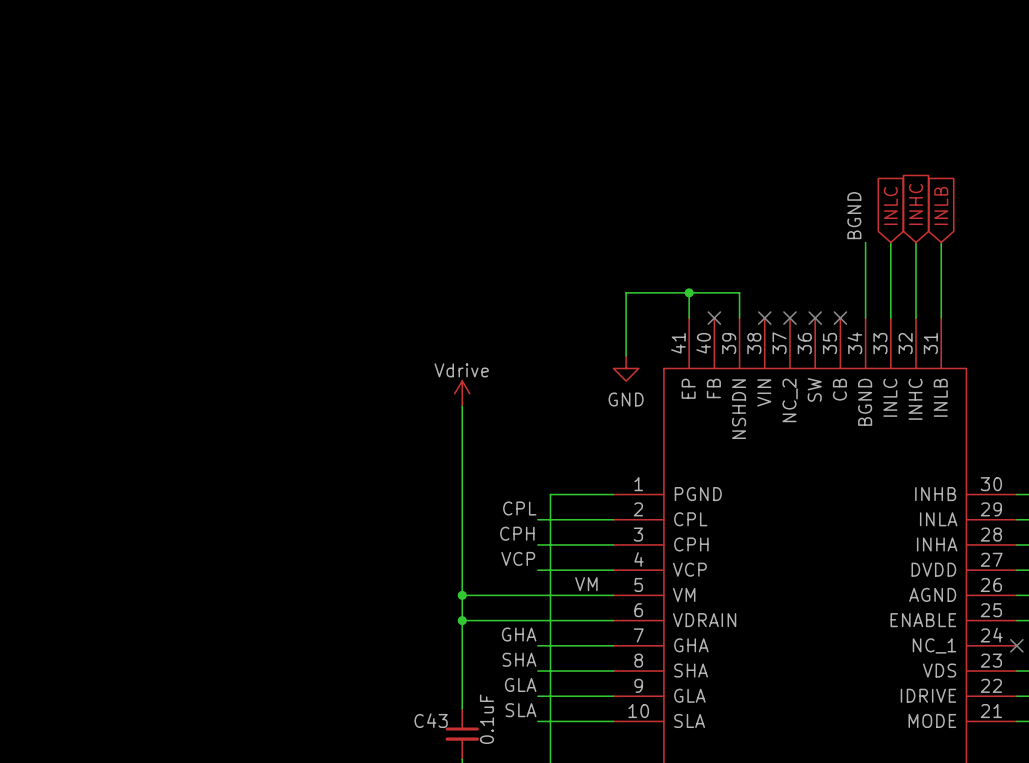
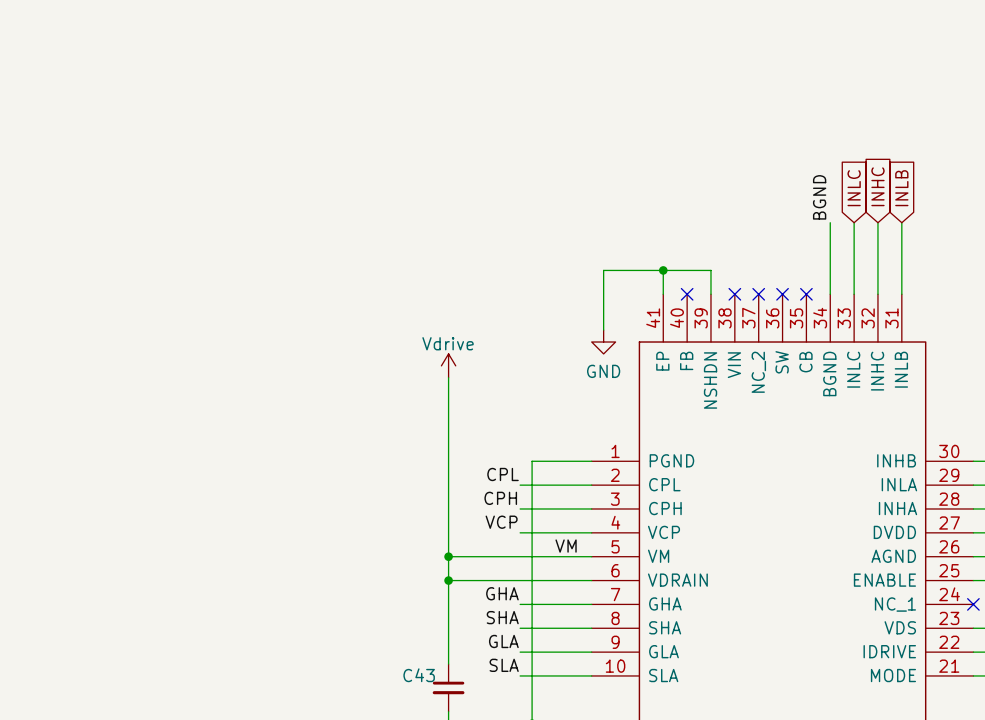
C43 value: 0.1uF (486, 719) -> none

